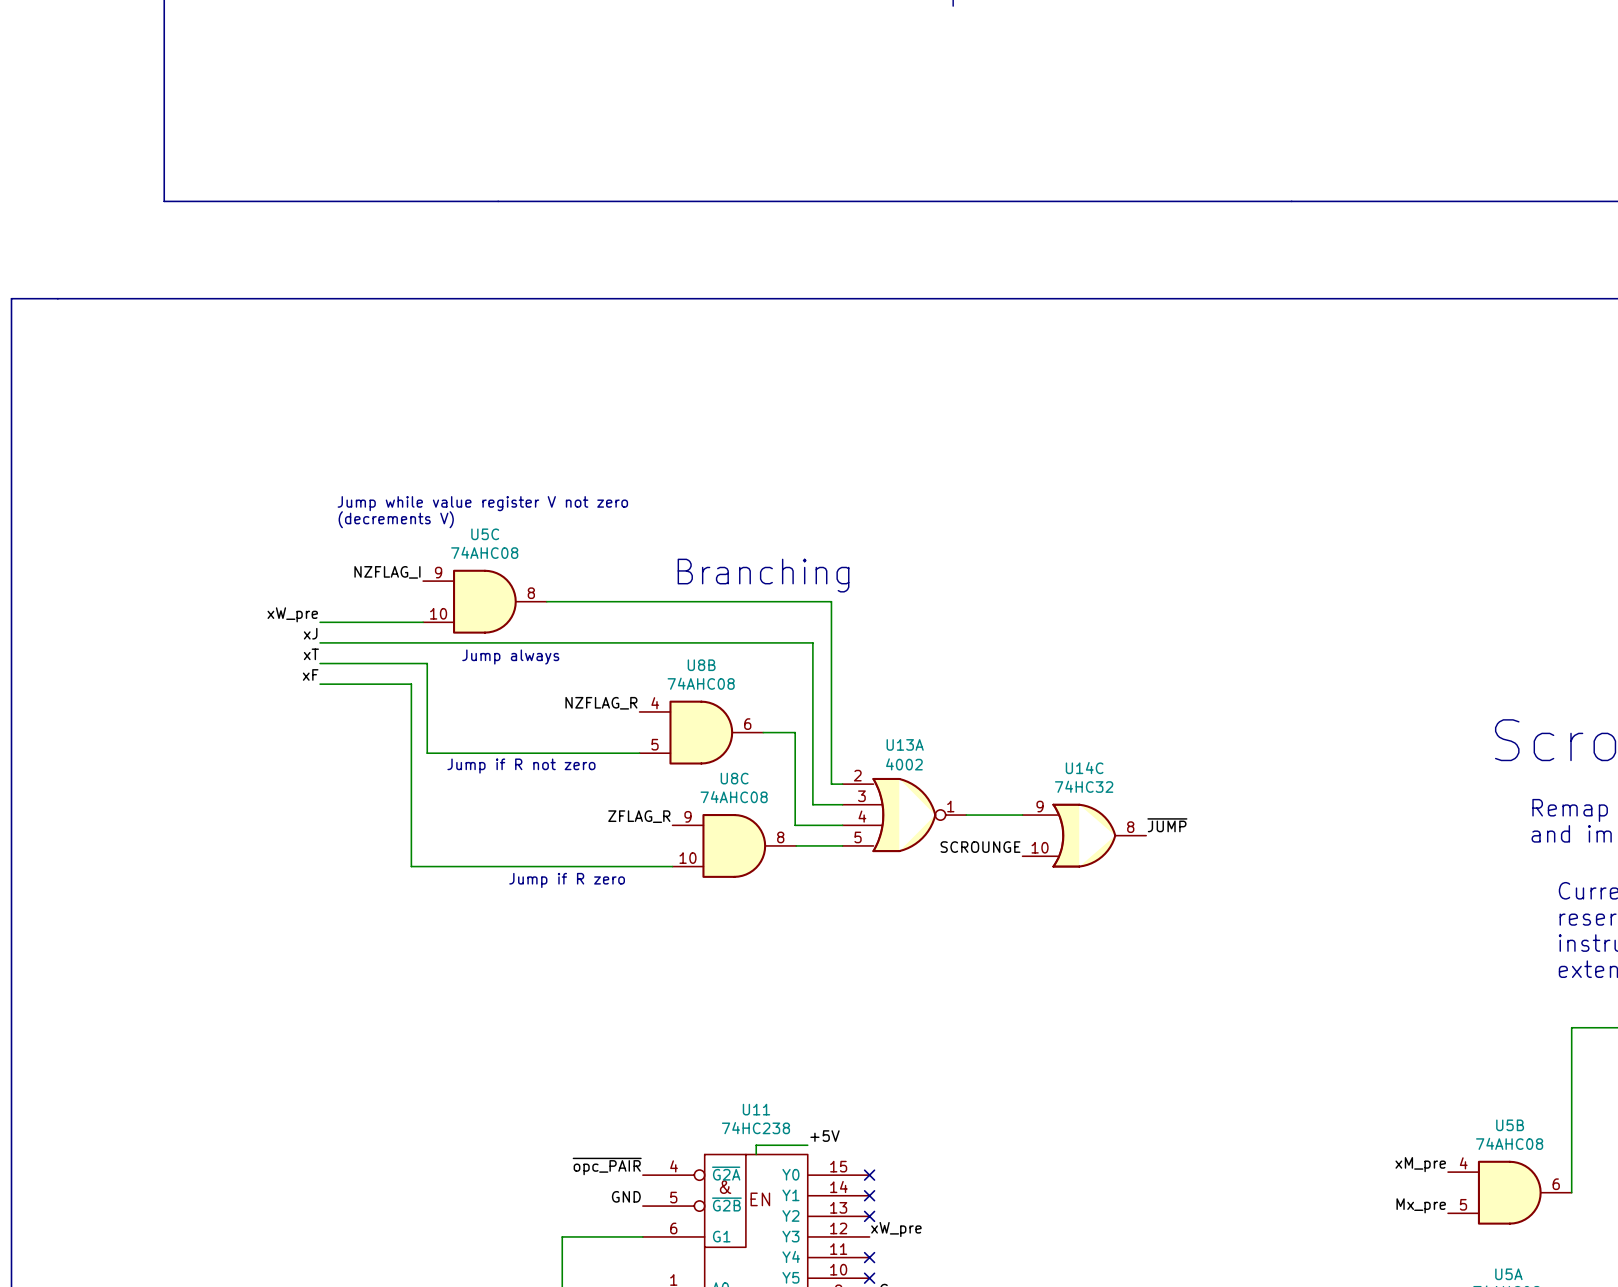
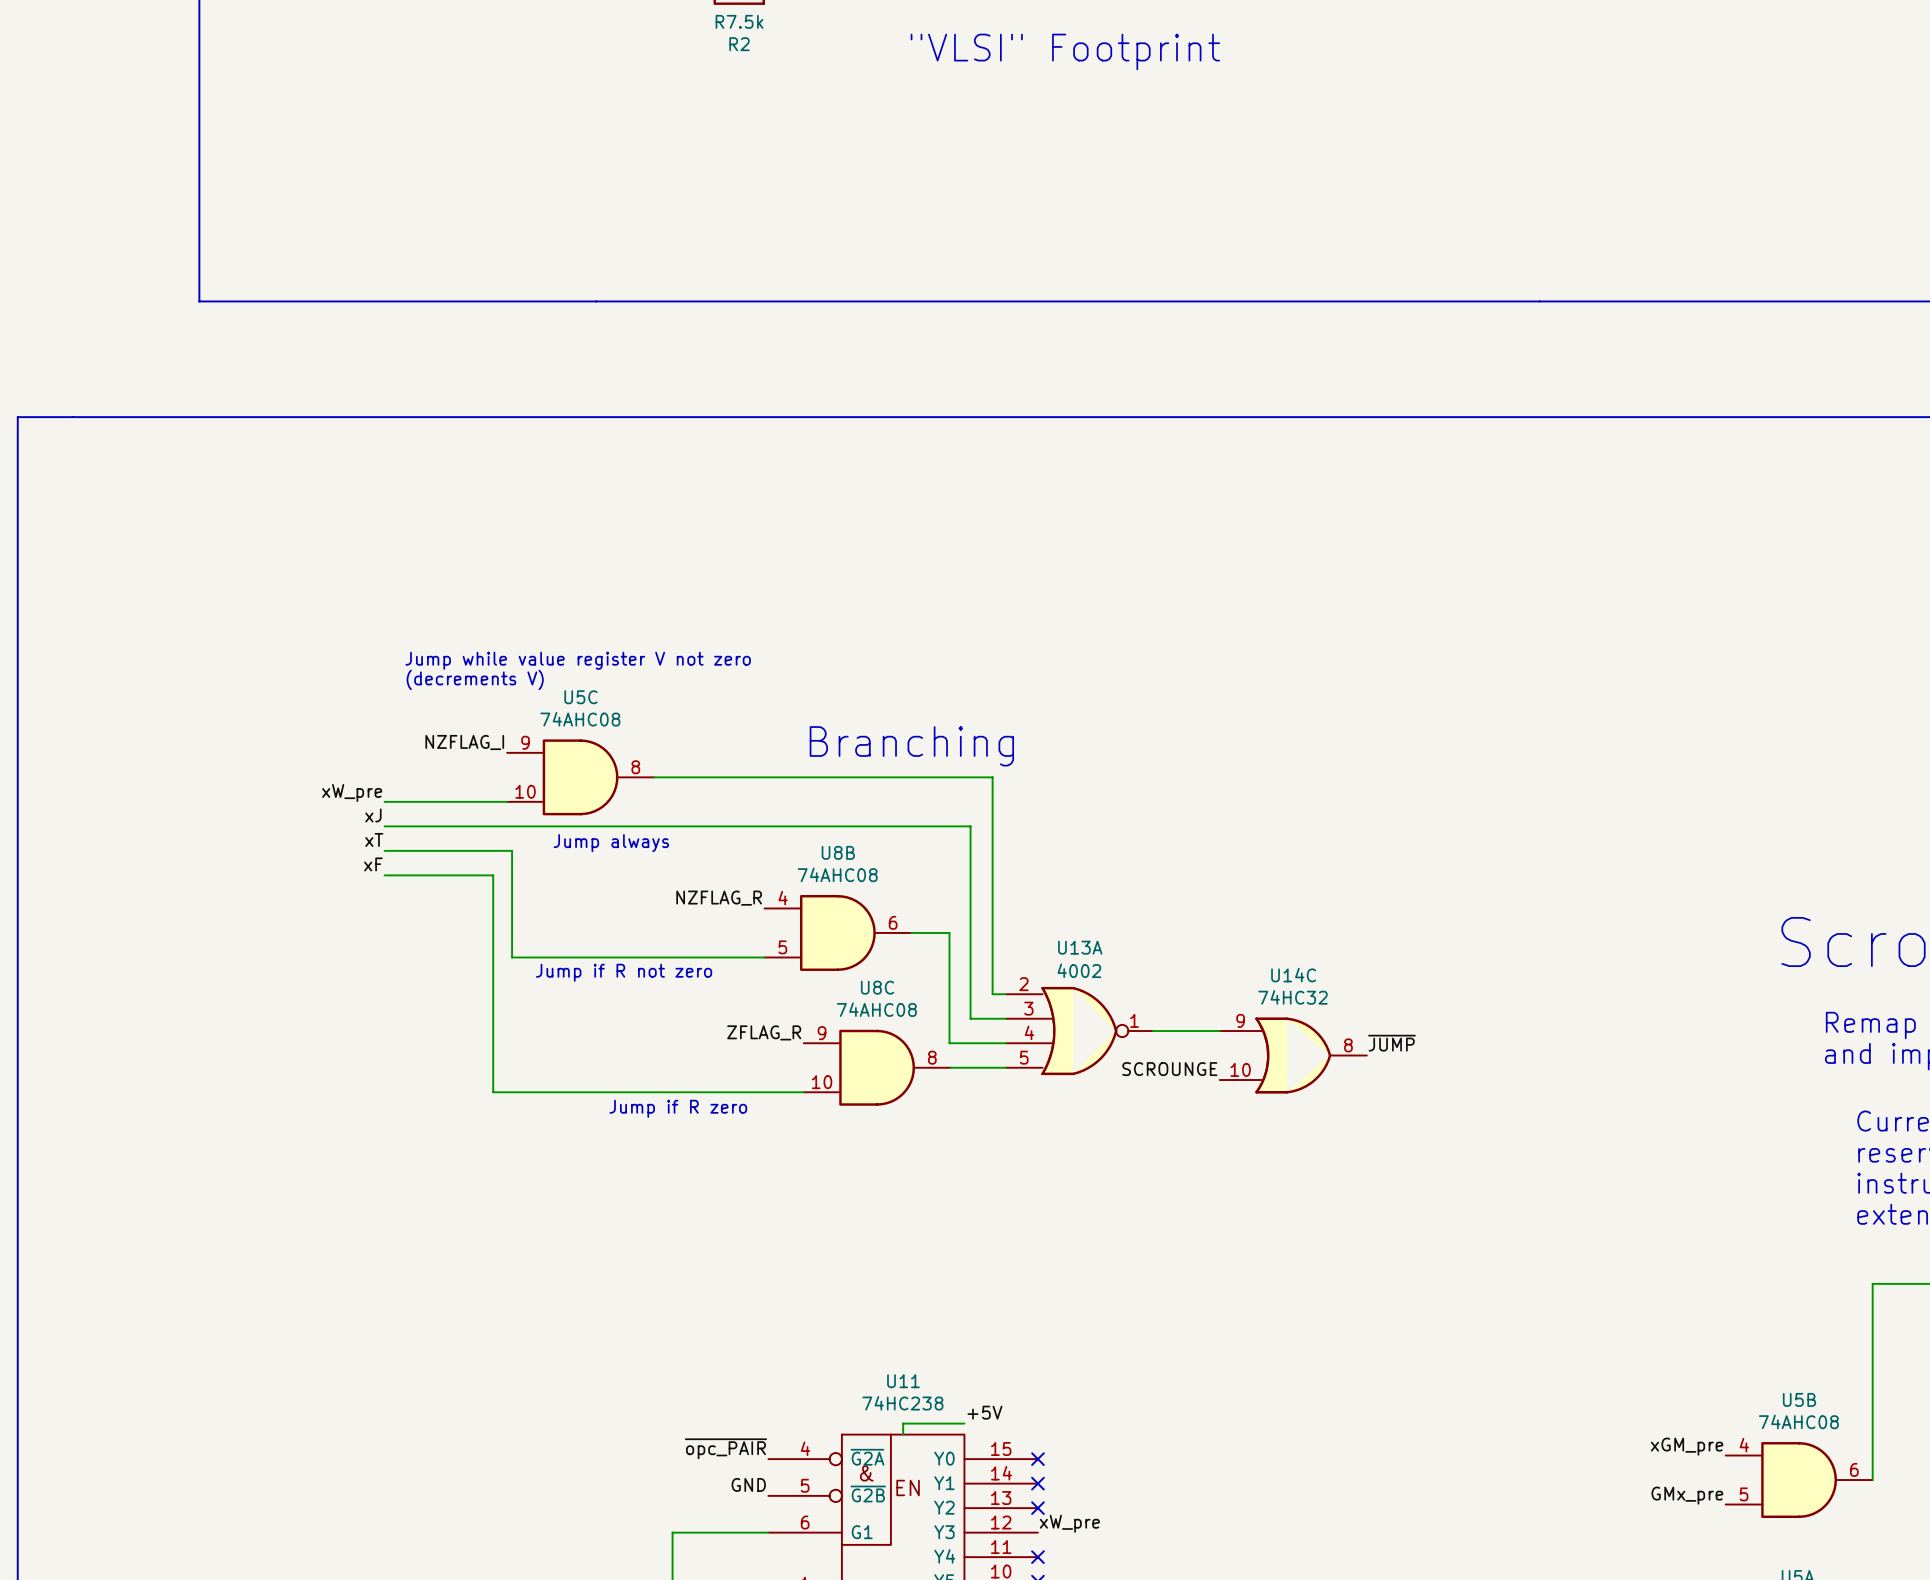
label: xM_pre (1420, 1164) -> xGM_pre (1687, 1446)
label: Mx_pre (1421, 1205) -> GMx_pre (1687, 1495)

